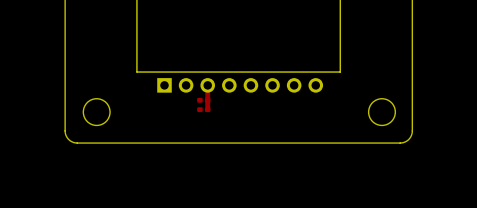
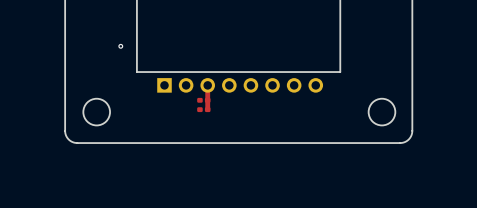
via: none -> (120, 46)

